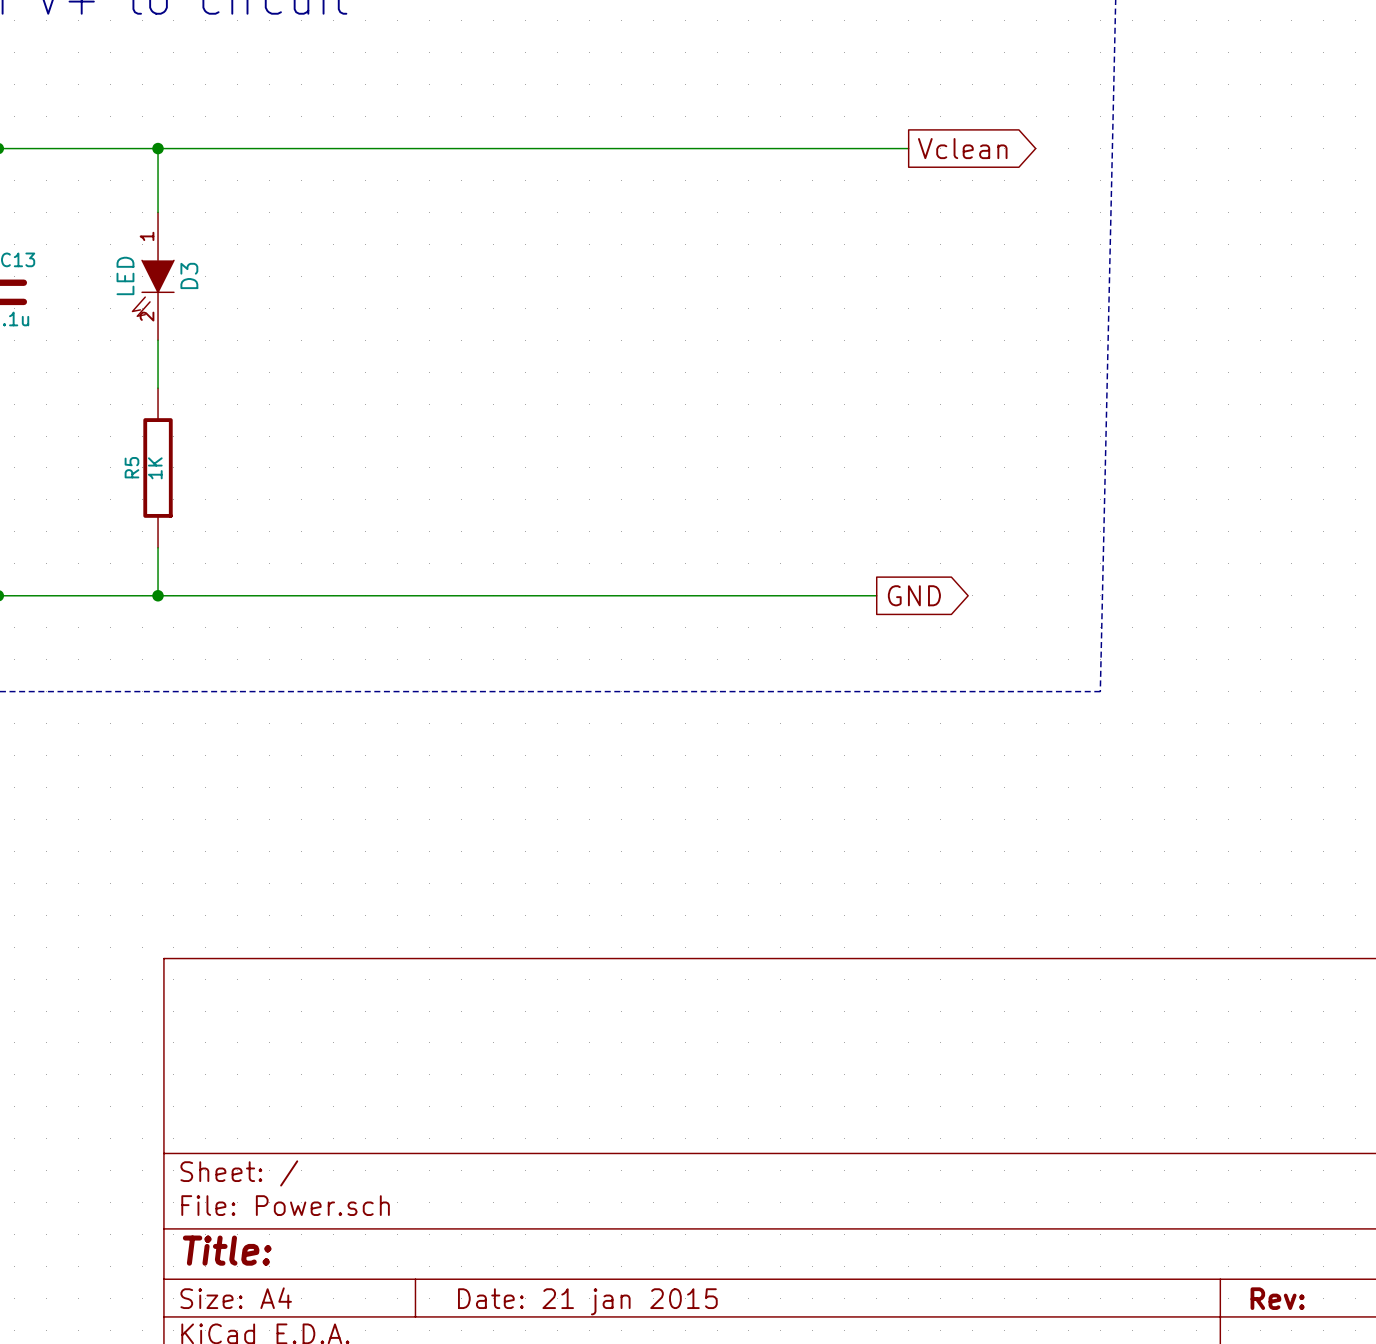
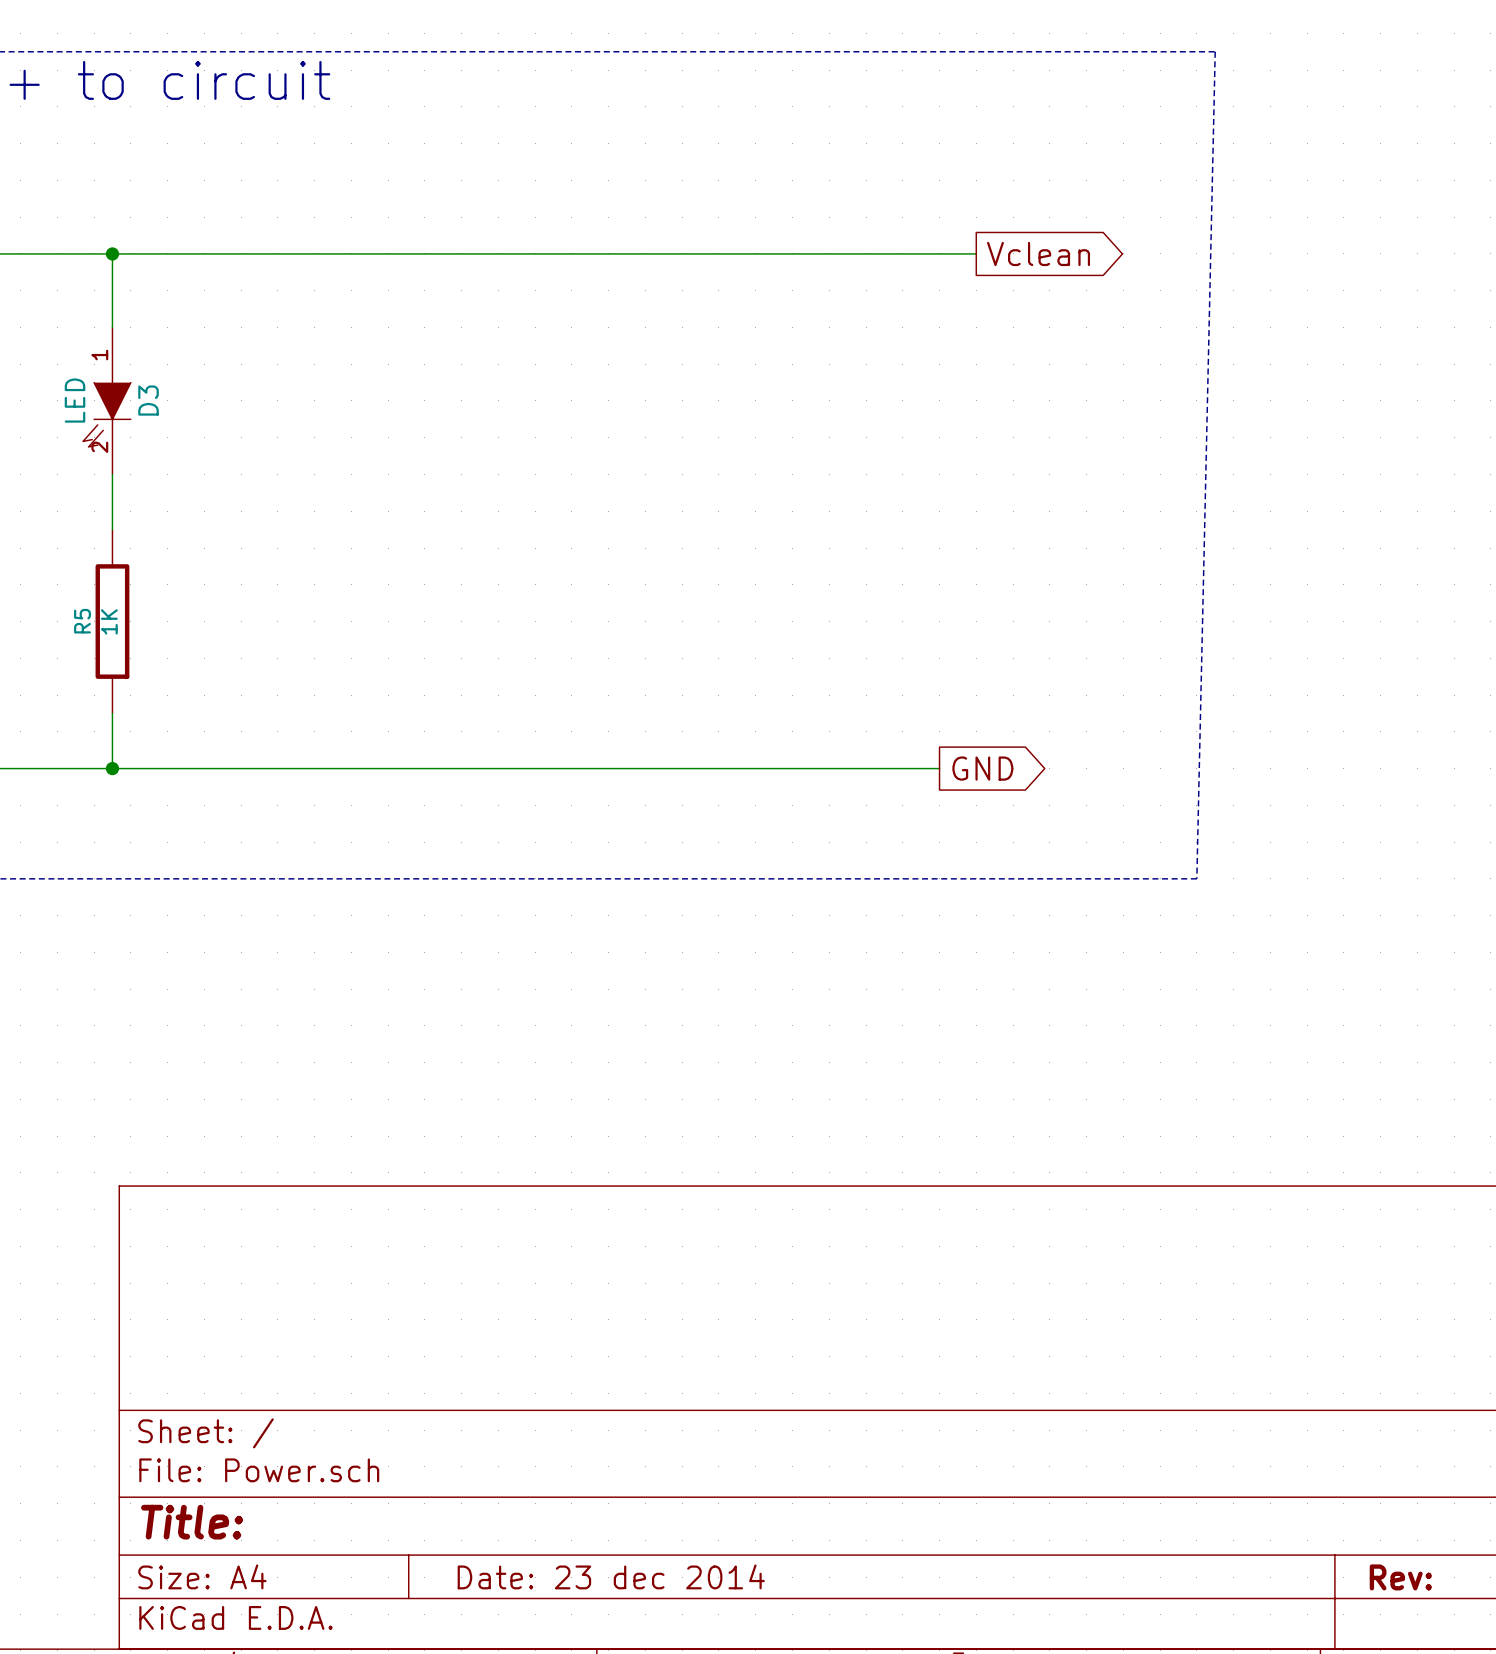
title block: Date: 21 jan 2015 (587, 1301) -> Date: 23 dec 2014 (611, 1576)

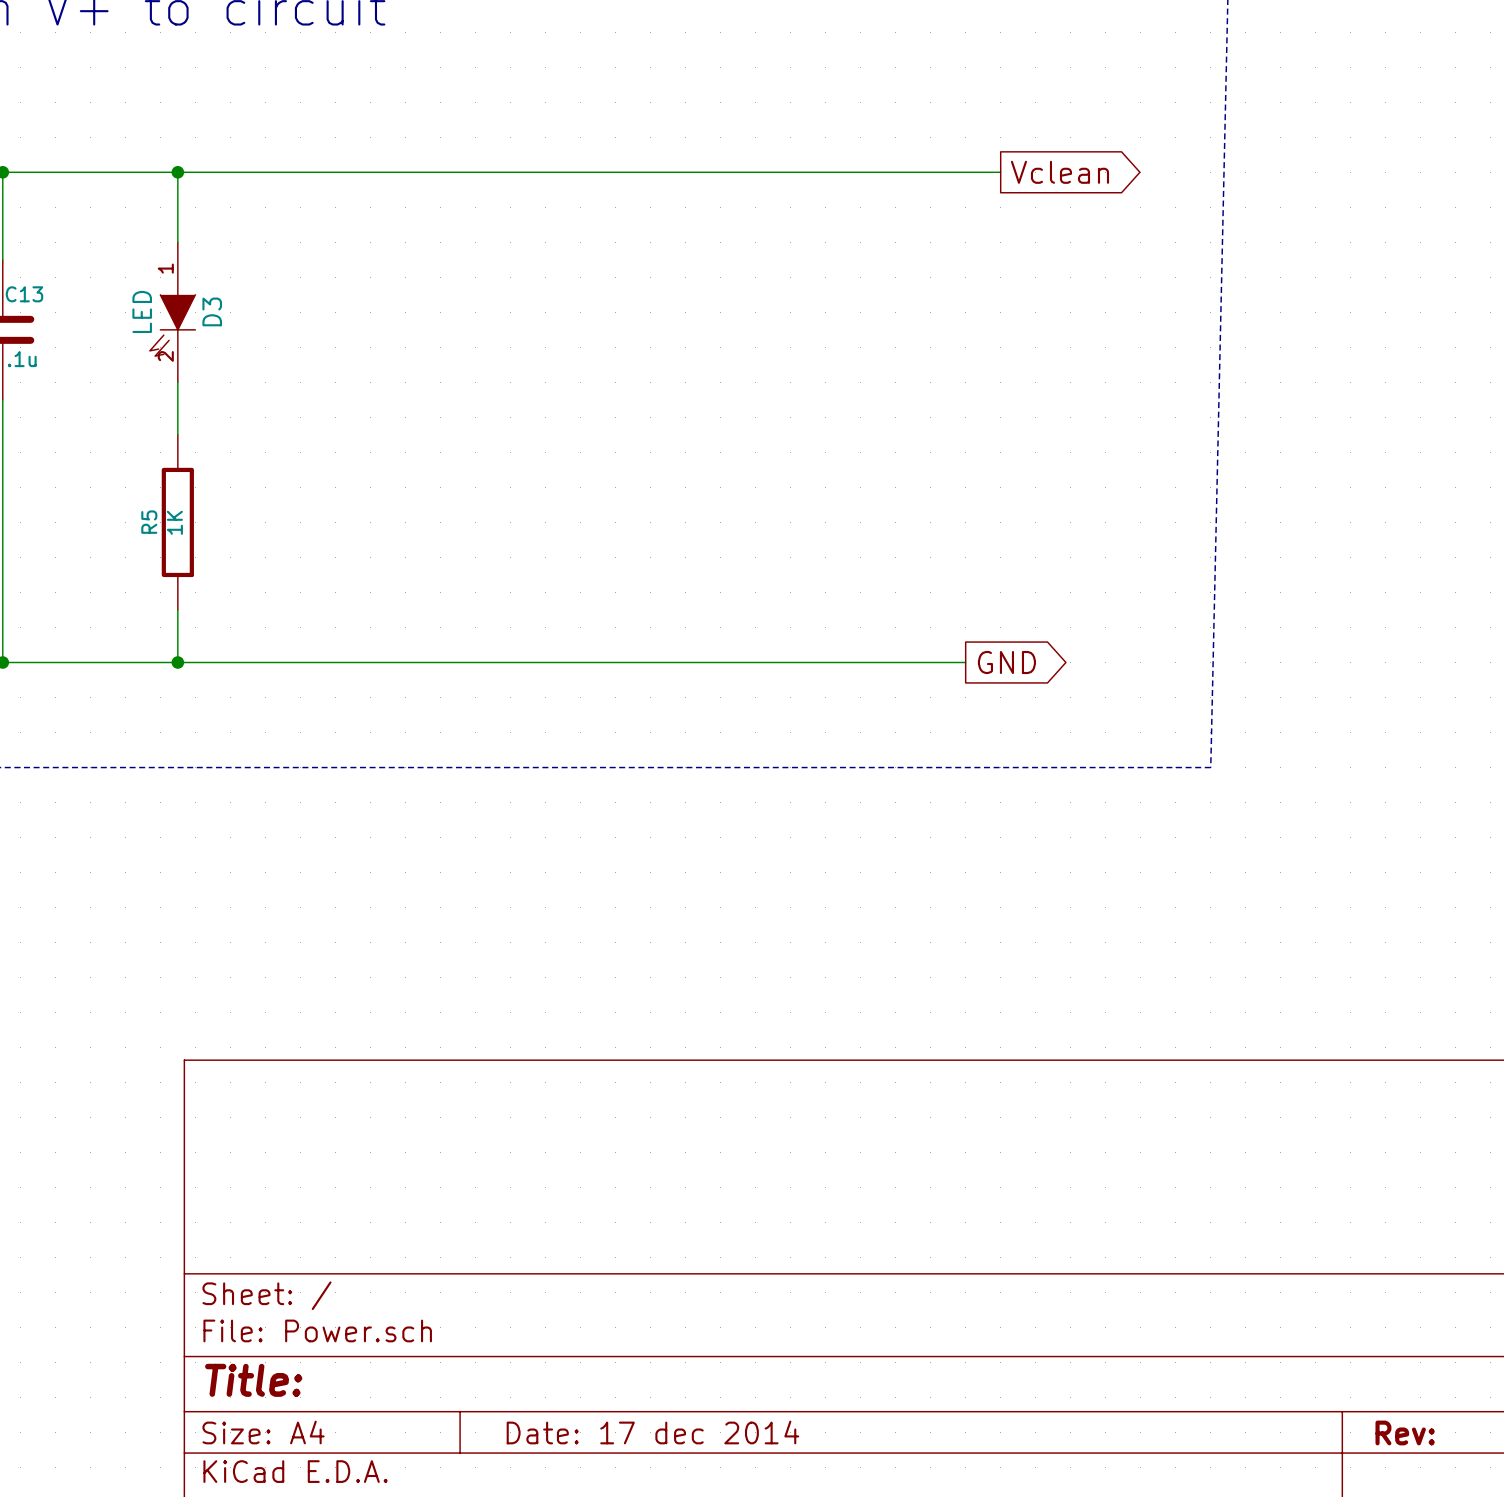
title block: Date: 23 dec 2014 (611, 1576) -> Date: 17 dec 2014 (652, 1432)

